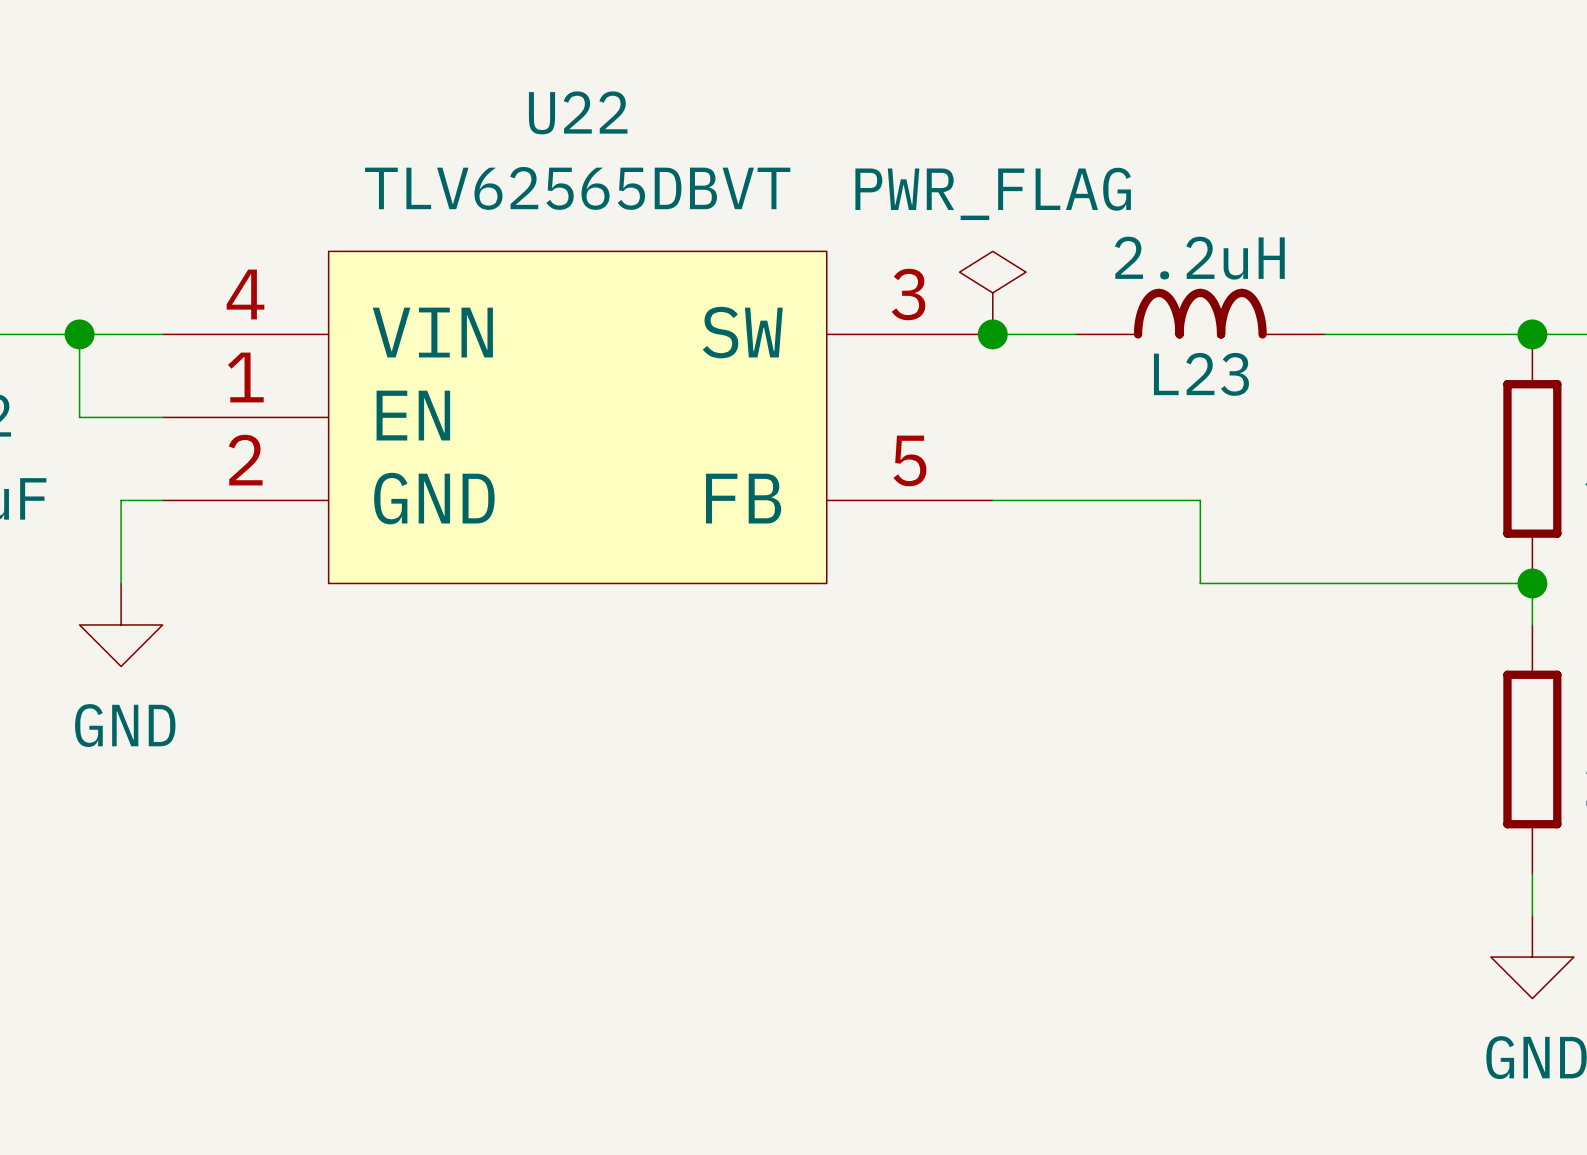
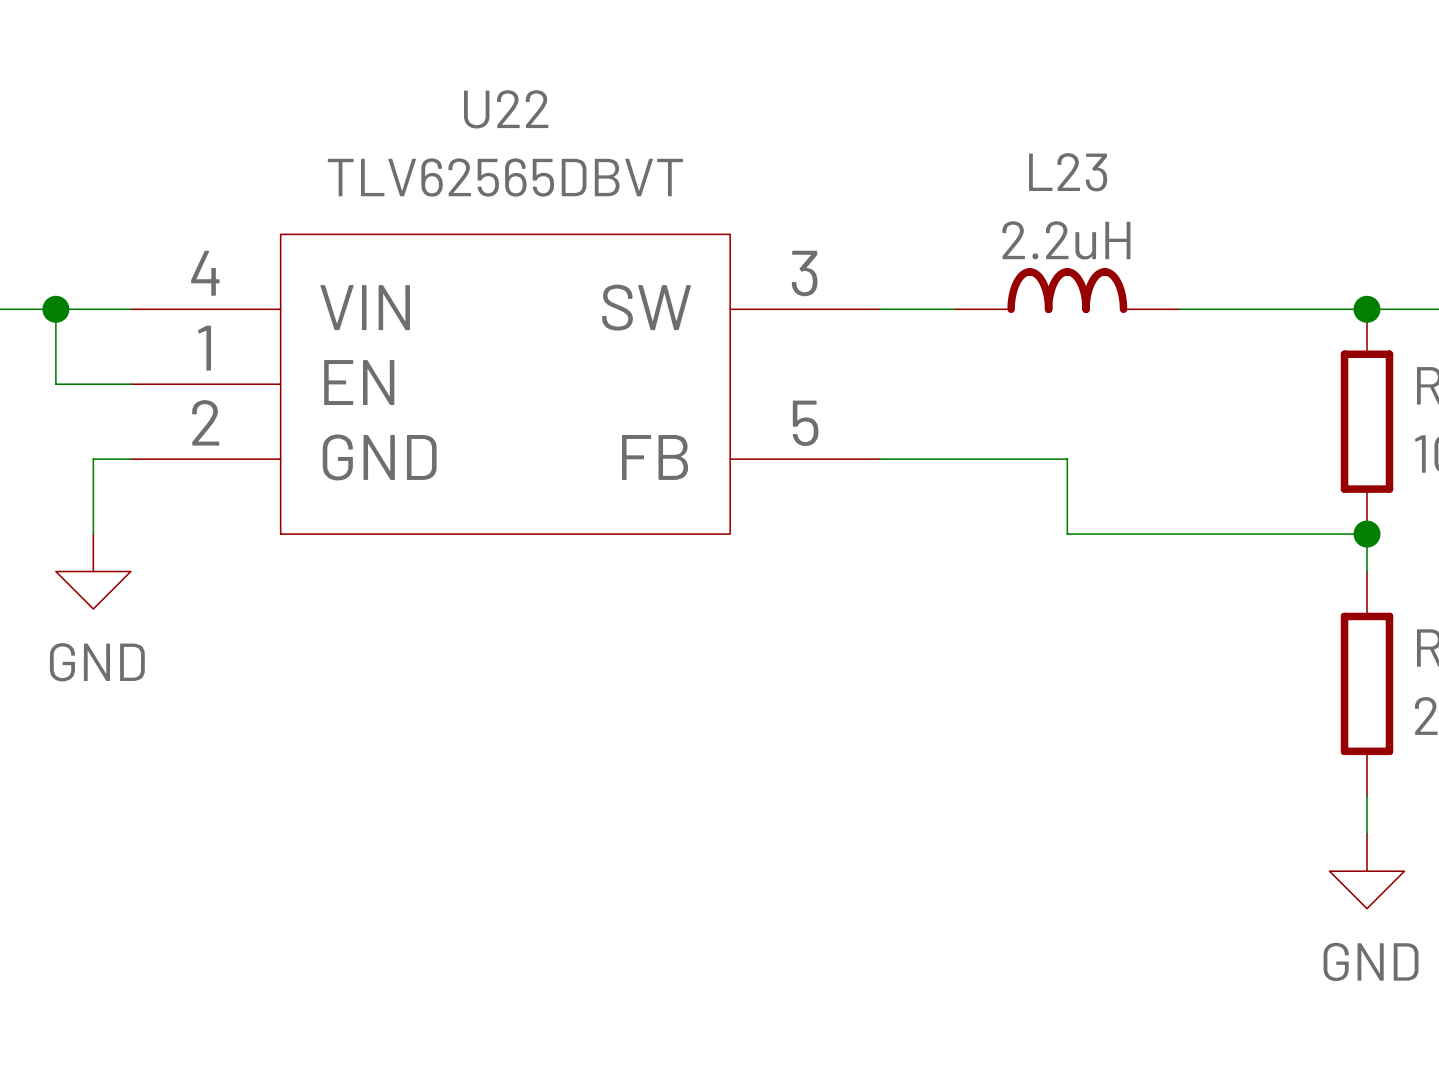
power symbol: PWR_FLAG (992, 292) -> none
junction: (992, 334) -> none
L23 name position: L23 (1201, 374) -> L23 (1068, 172)

